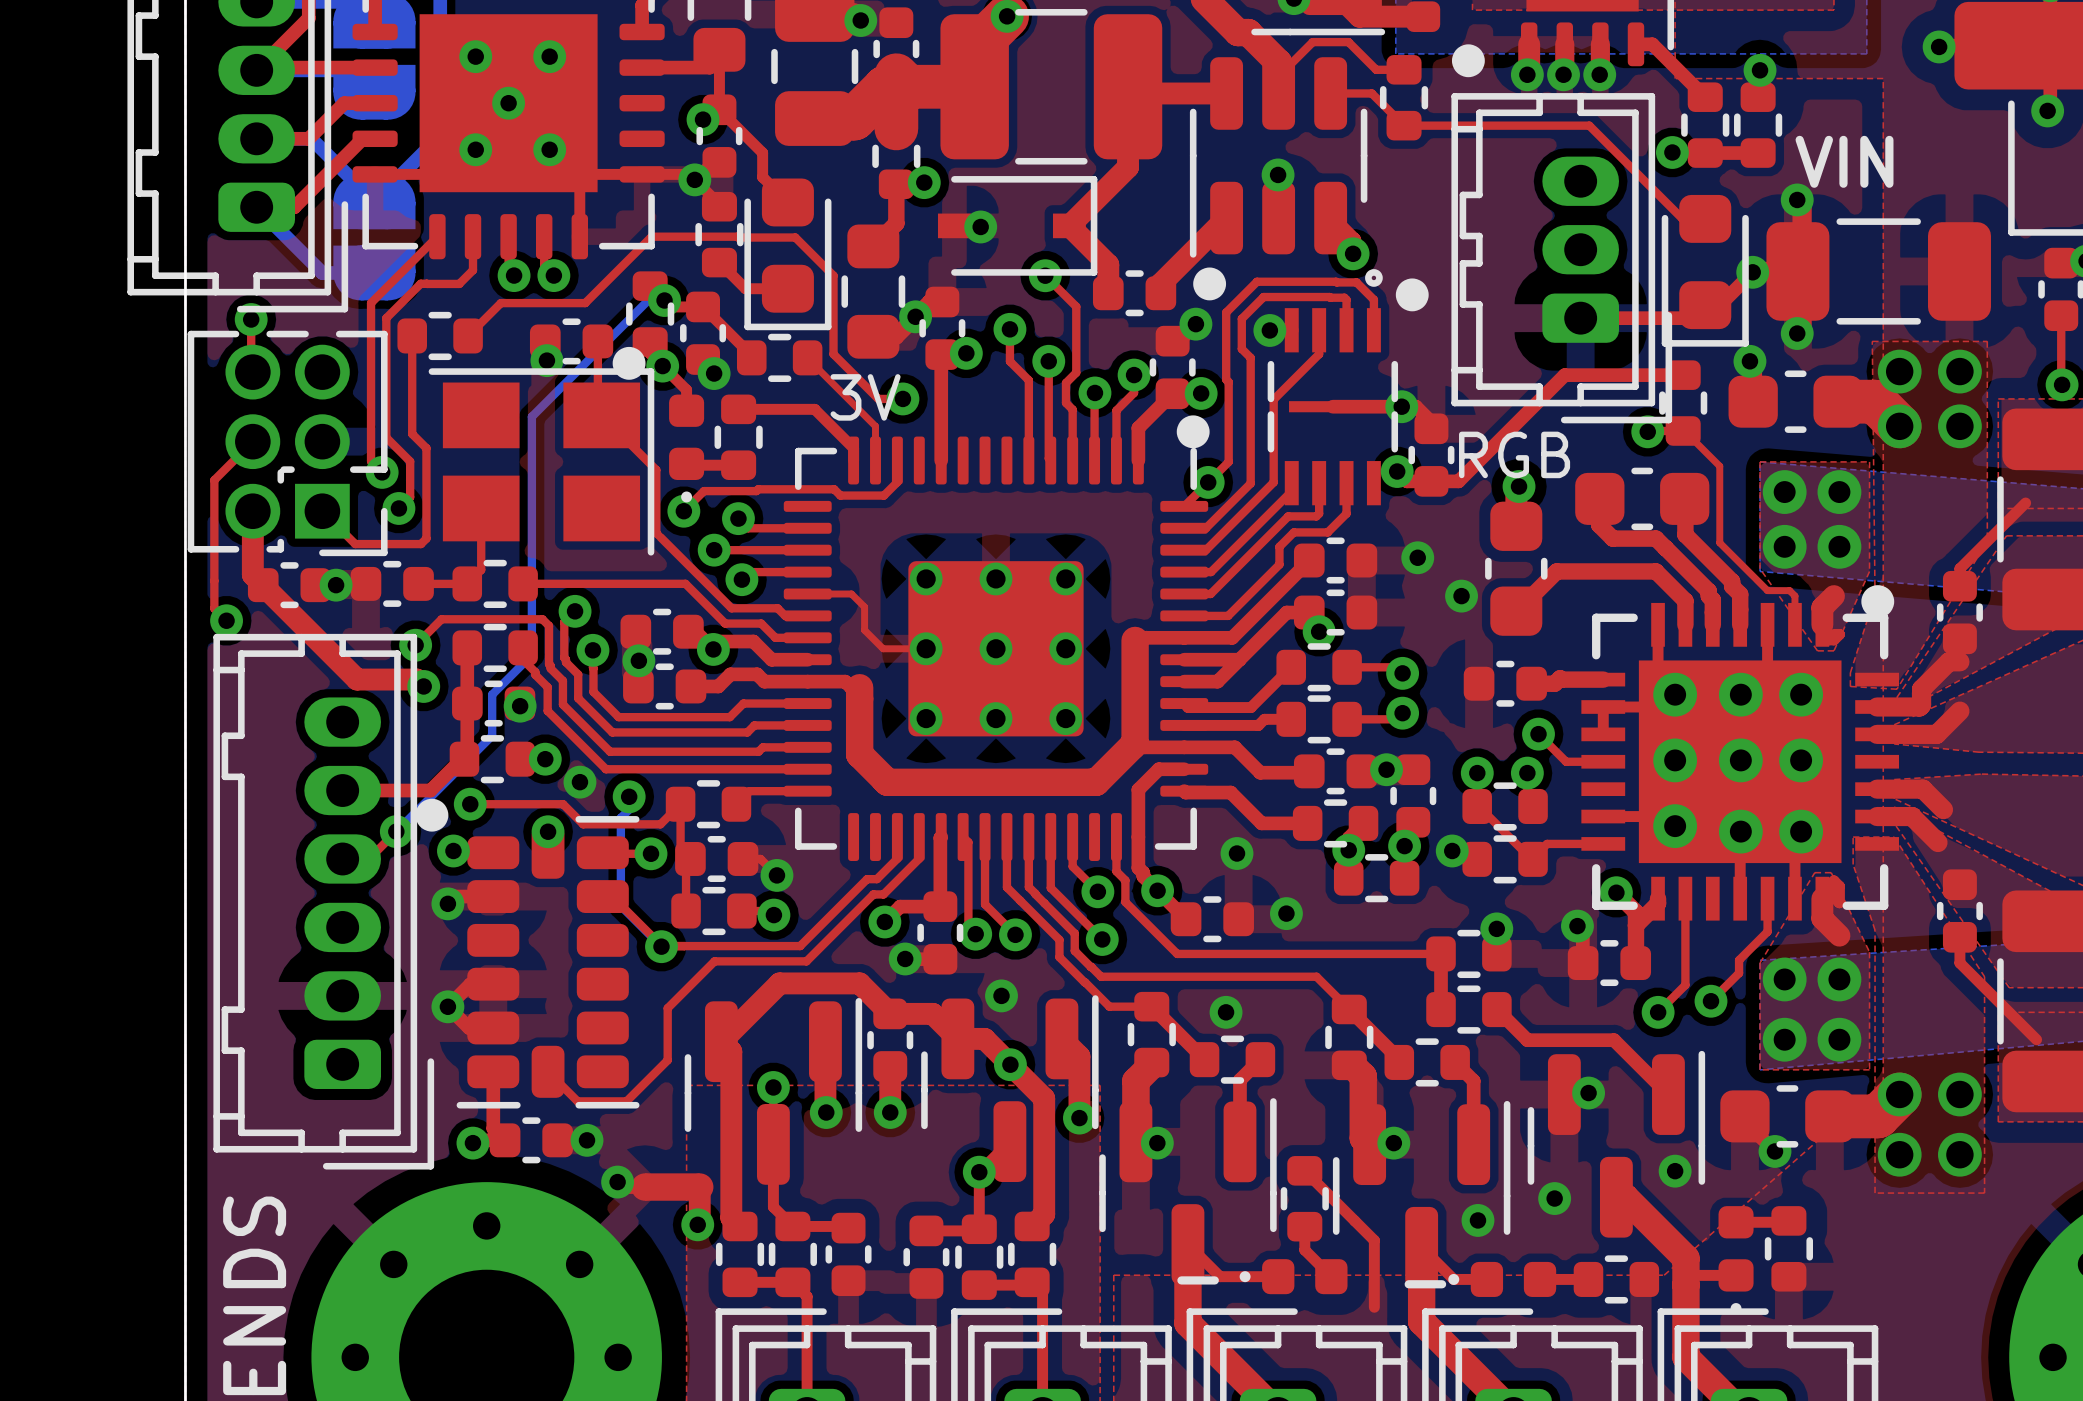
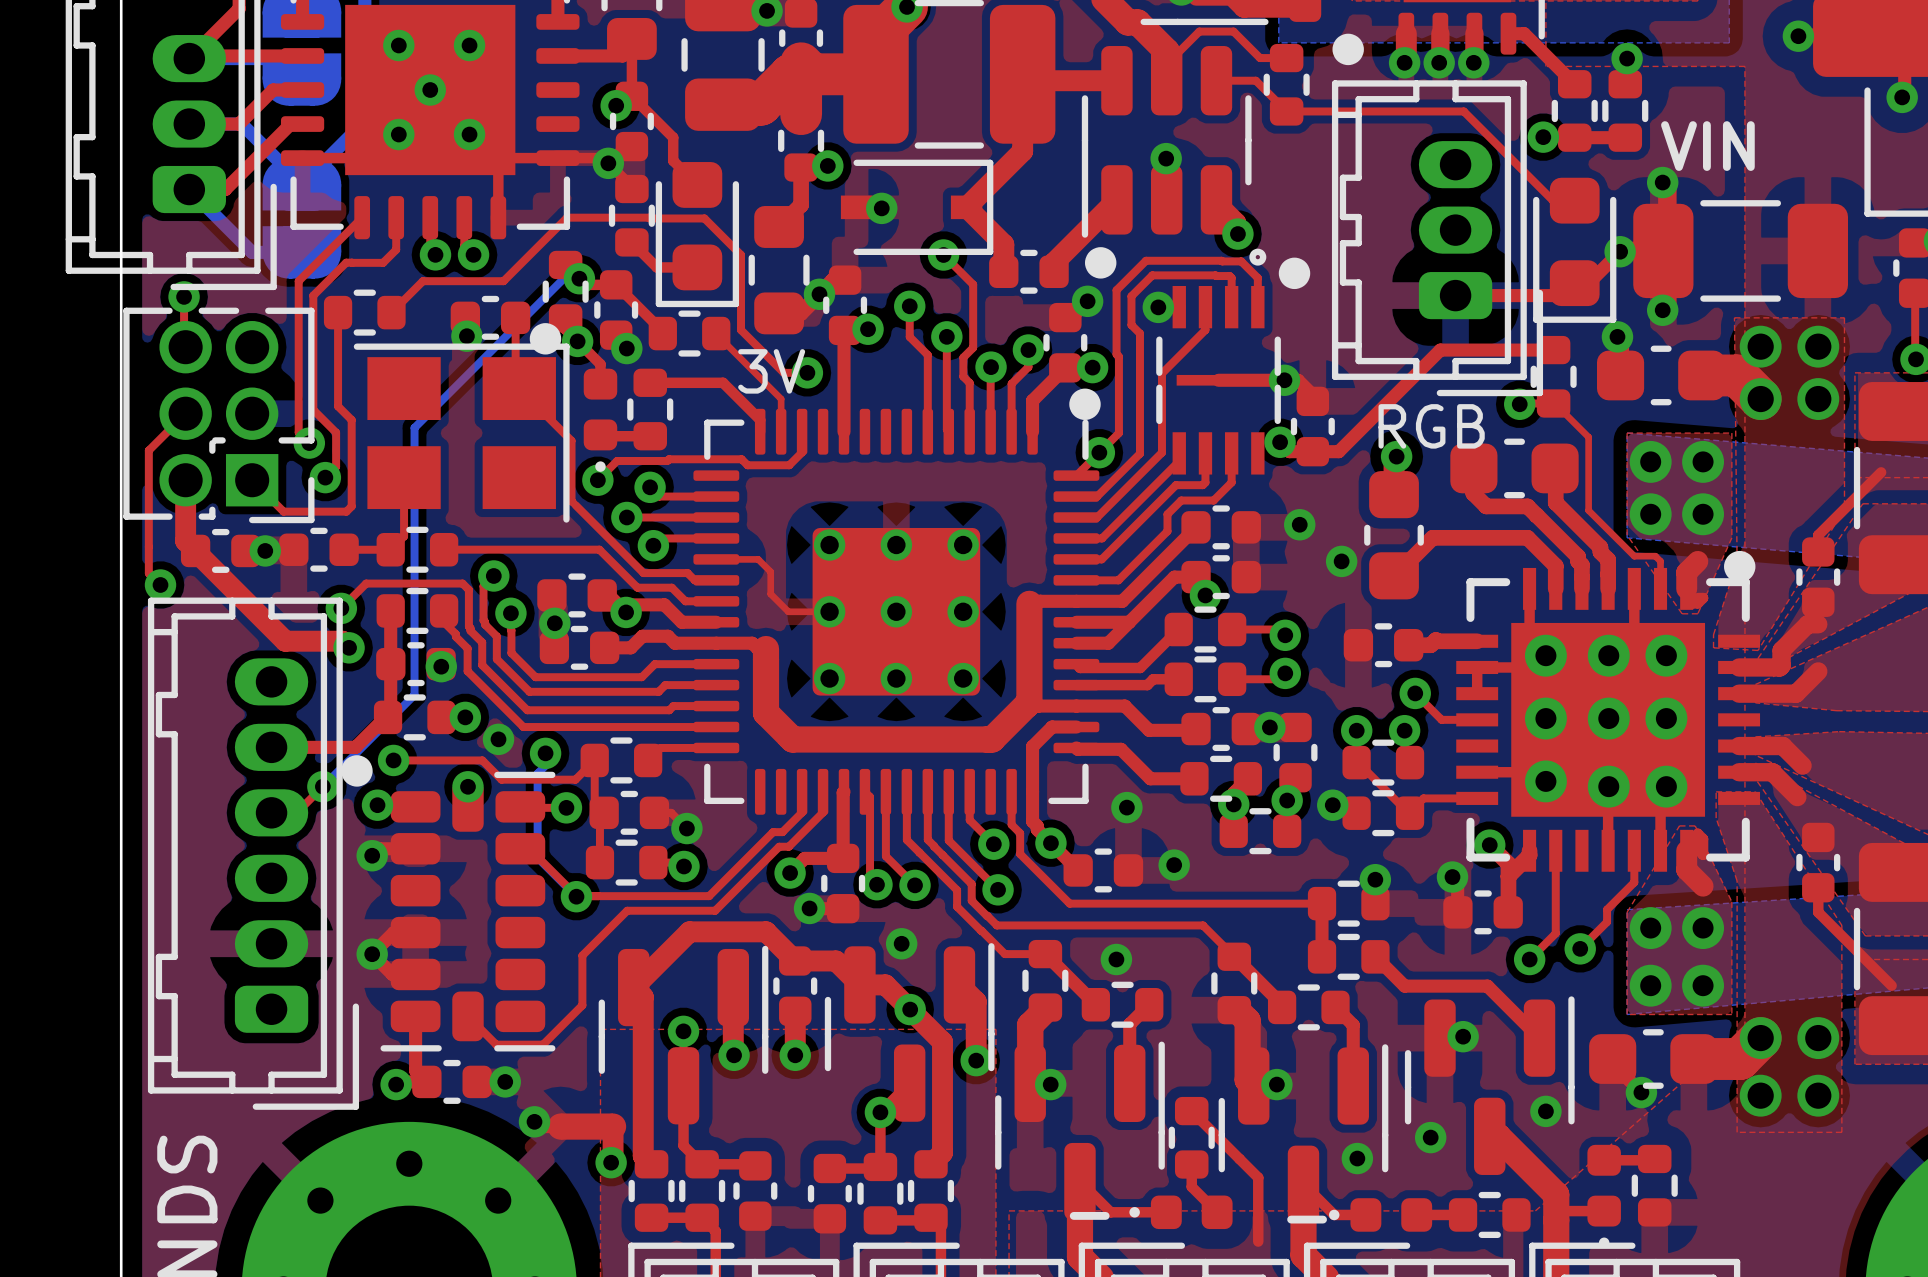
bottom track: (531, 416) (531, 654) (492, 694) -> (452, 389) (414, 427) (414, 655)
text position: RGB (1514, 454) -> RGB (1431, 426)

